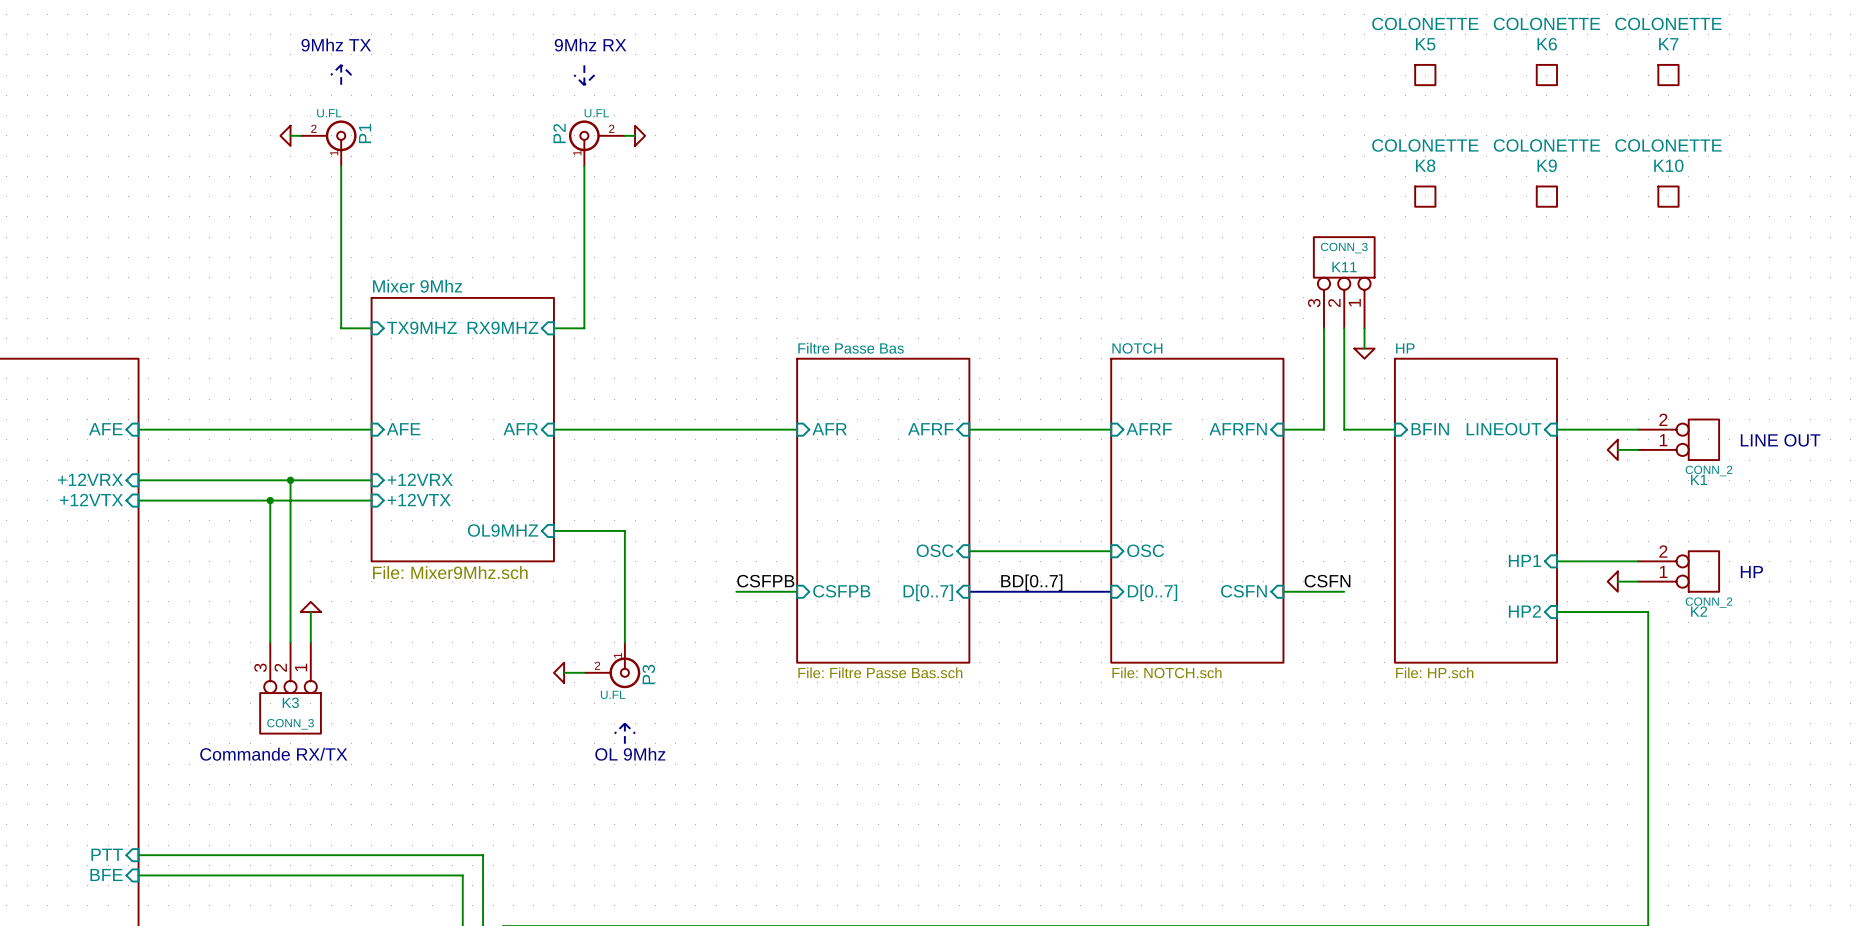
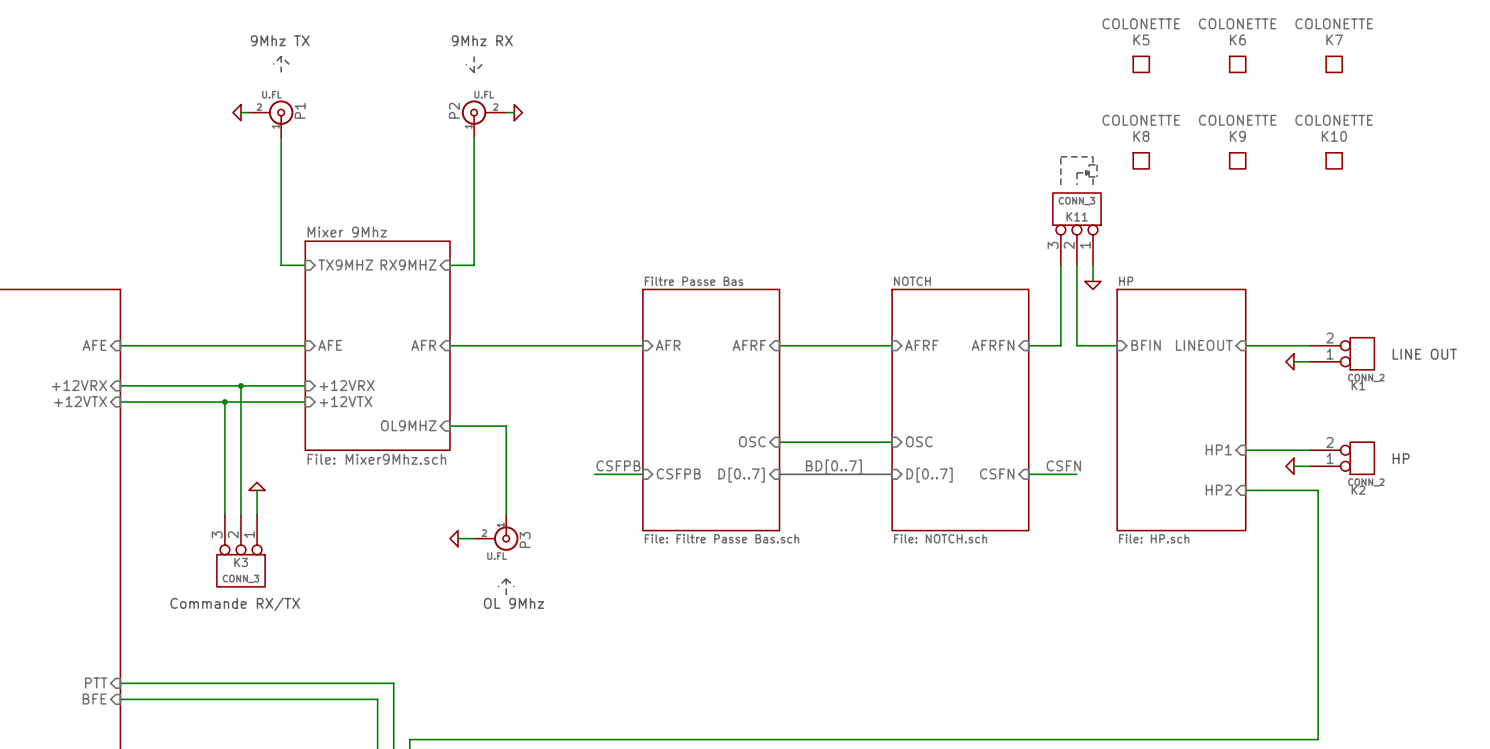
line: none -> (1089, 164) (1089, 176) (1097, 176) (1097, 164) (1089, 164)
line: none -> (1093, 164) (1093, 156) (1060, 156) (1060, 184)
line: none -> (1089, 172) (1076, 172) (1076, 184)
line: none -> (1089, 172) (1085, 170) (1085, 175) (1089, 172)
line: none -> (1093, 176) (1093, 184)

